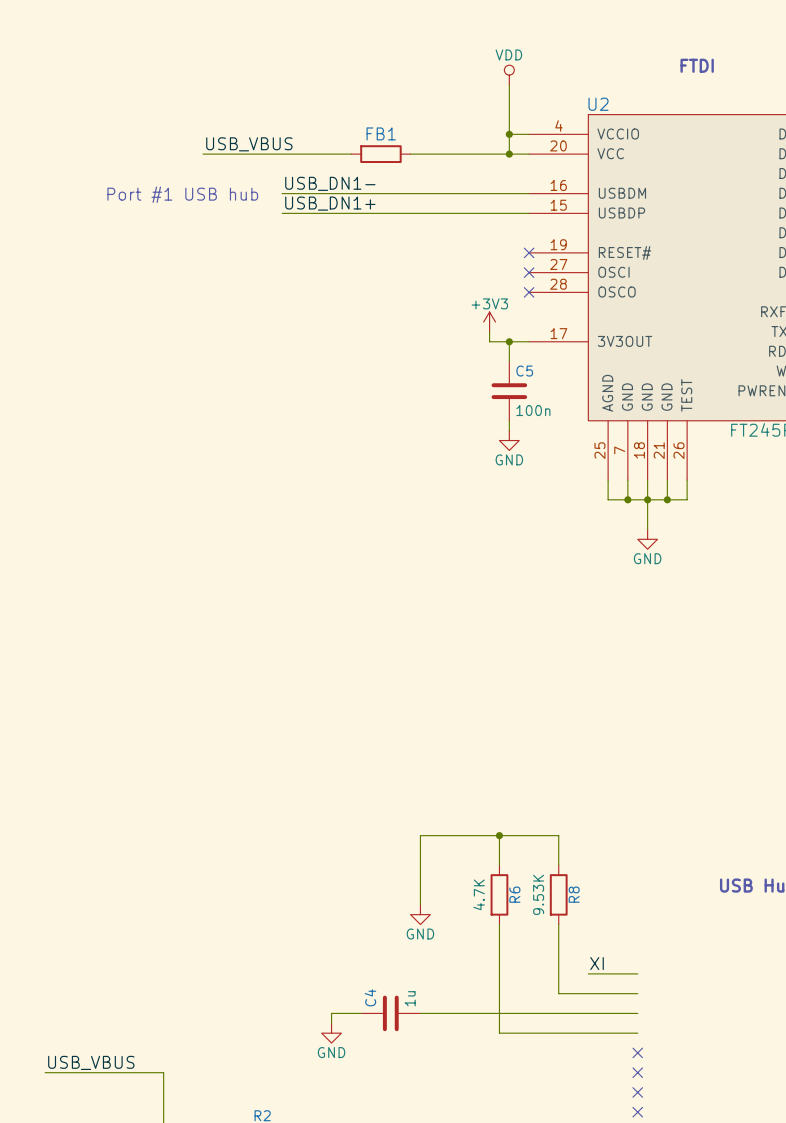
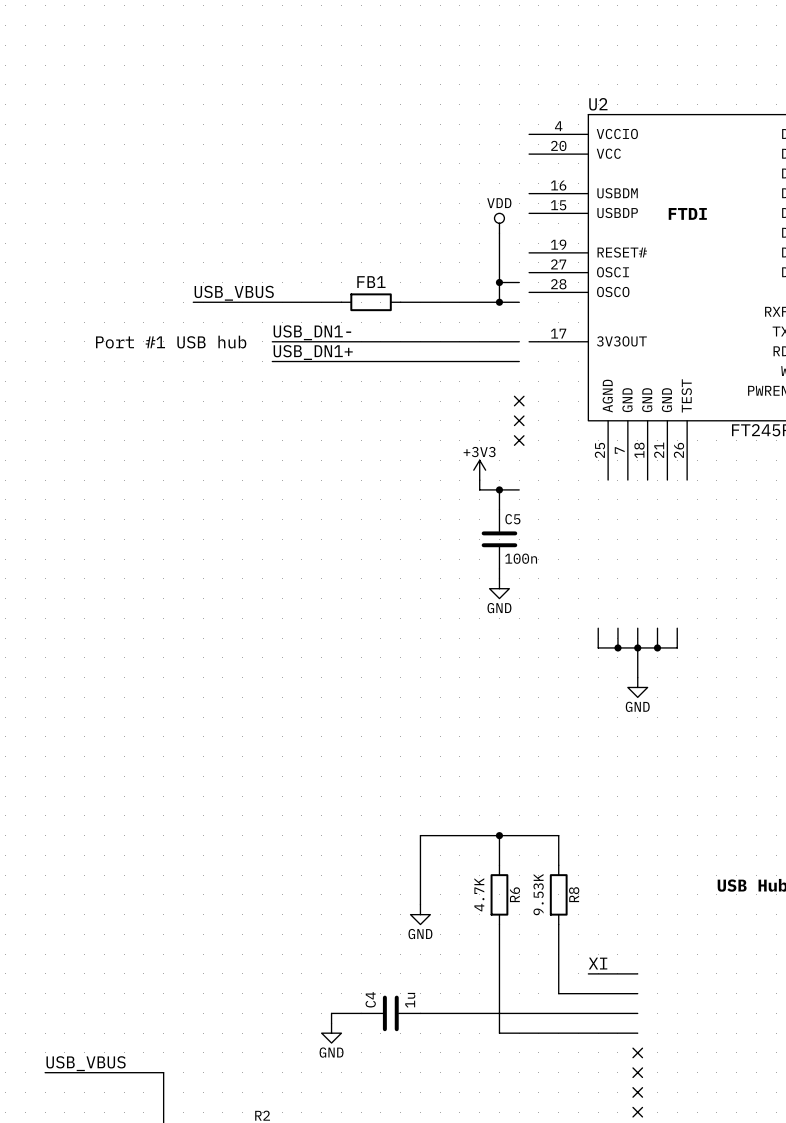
text position: FTDI (697, 65) -> FTDI (687, 213)
power symbol position: VDD (509, 75) -> VDD (499, 223)
wire: (509, 84) (509, 154) -> (499, 233) (499, 302)
wire: (509, 134) (529, 134) -> (499, 282) (519, 282)
junction: (509, 134) -> none
label position: USB_VBUS (249, 144) -> USB_VBUS (234, 293)
wire: (203, 154) (351, 154) -> (193, 302) (341, 302)
FB1 position: (380, 154) -> (371, 302)
wire: (410, 154) (529, 154) -> (400, 302) (519, 302)
junction: (509, 154) -> none
label position: USB_DN1- (330, 183) -> USB_DN1- (312, 332)
wire: (282, 193) (529, 193) -> none
text position: Port #1 USB hub (182, 194) -> Port #1 USB hub (171, 342)
label position: USB_DN1+ (330, 203) -> USB_DN1+ (313, 352)
wire: (282, 213) (529, 213) -> (272, 361) (519, 361)
no-connect mark: (529, 252) -> none
no-connect mark: (529, 272) -> none
junction: none -> (499, 282)
no-connect mark: (529, 292) -> none
junction: none -> (499, 302)
power symbol position: +3V3 (489, 322) -> +3V3 (479, 470)
wire: (489, 331) (489, 341) -> (272, 341) (489, 341)
wire: (509, 341) (509, 361) -> (499, 489) (499, 509)
junction: (509, 341) -> none
wire: (519, 341) (529, 341) -> none
C5 position: (509, 391) -> (499, 539)
no-connect mark: none -> (519, 401)
wire: (509, 420) (509, 430) -> (499, 568) (499, 578)
no-connect mark: none -> (519, 420)
power symbol: GND (509, 440) -> none
no-connect mark: none -> (519, 440)
wire: none -> (479, 480) (479, 489) (519, 489)
wire: (608, 480) (608, 499) (687, 499) (687, 480) -> (598, 628) (598, 647) (677, 647) (677, 628)
wire: (627, 480) (627, 499) -> (617, 628) (617, 647)
wire: (647, 480) (647, 529) -> (637, 628) (637, 677)
wire: (667, 480) (667, 499) -> (657, 628) (657, 647)
junction: none -> (499, 489)
junction: (627, 499) -> none
junction: (647, 499) -> none
junction: (667, 499) -> none
power symbol: GND (647, 539) -> none
power symbol: none -> GND (499, 588)
junction: none -> (617, 647)
junction: none -> (637, 647)
junction: none -> (657, 647)
power symbol: none -> GND (637, 687)

